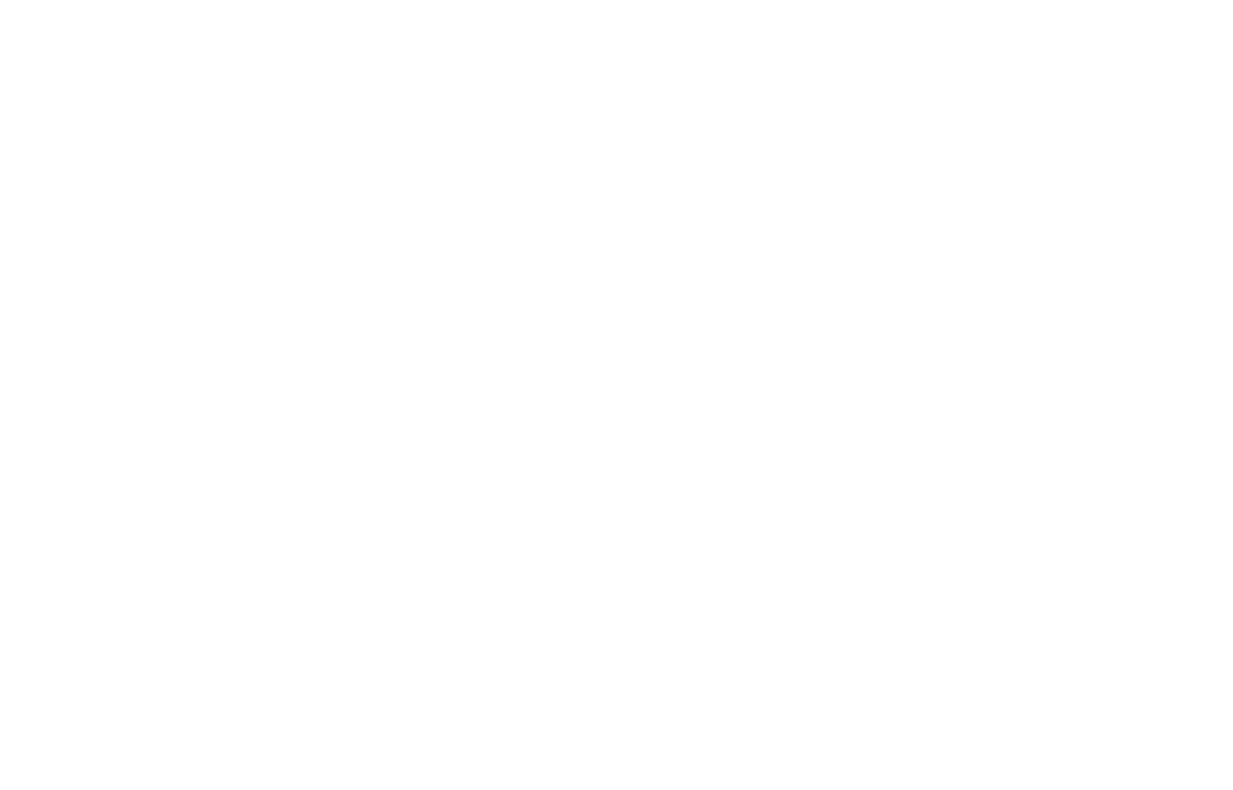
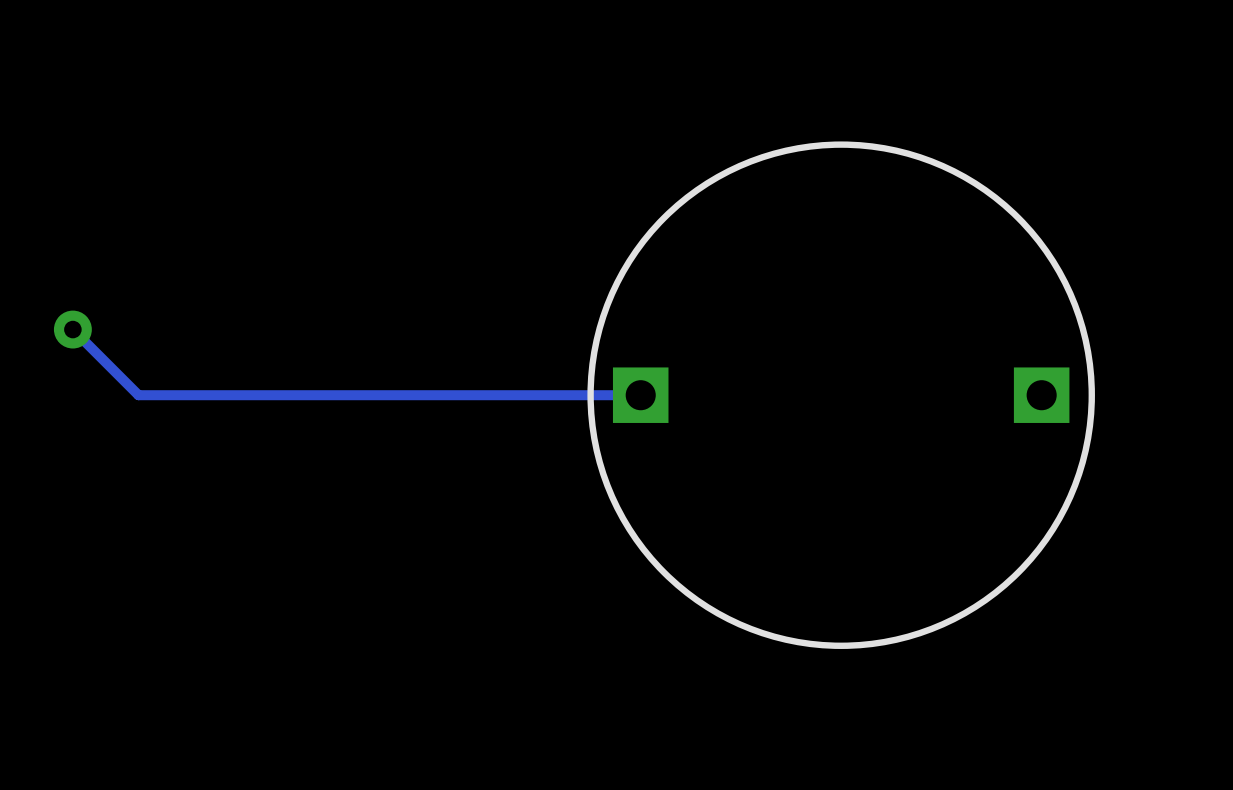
track: none -> (72, 329) (138, 395) (640, 395)
via: none -> (72, 329)
part: none -> (841, 395)

